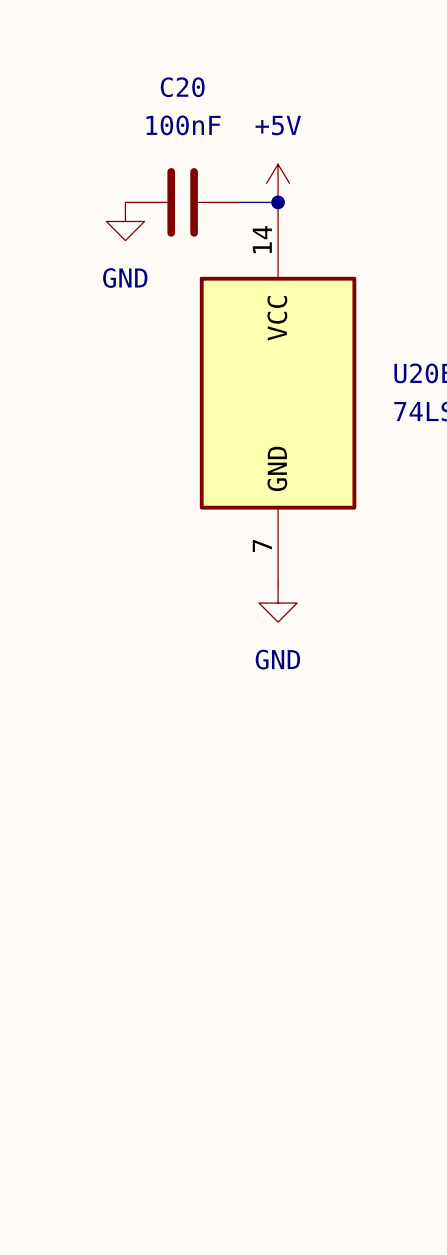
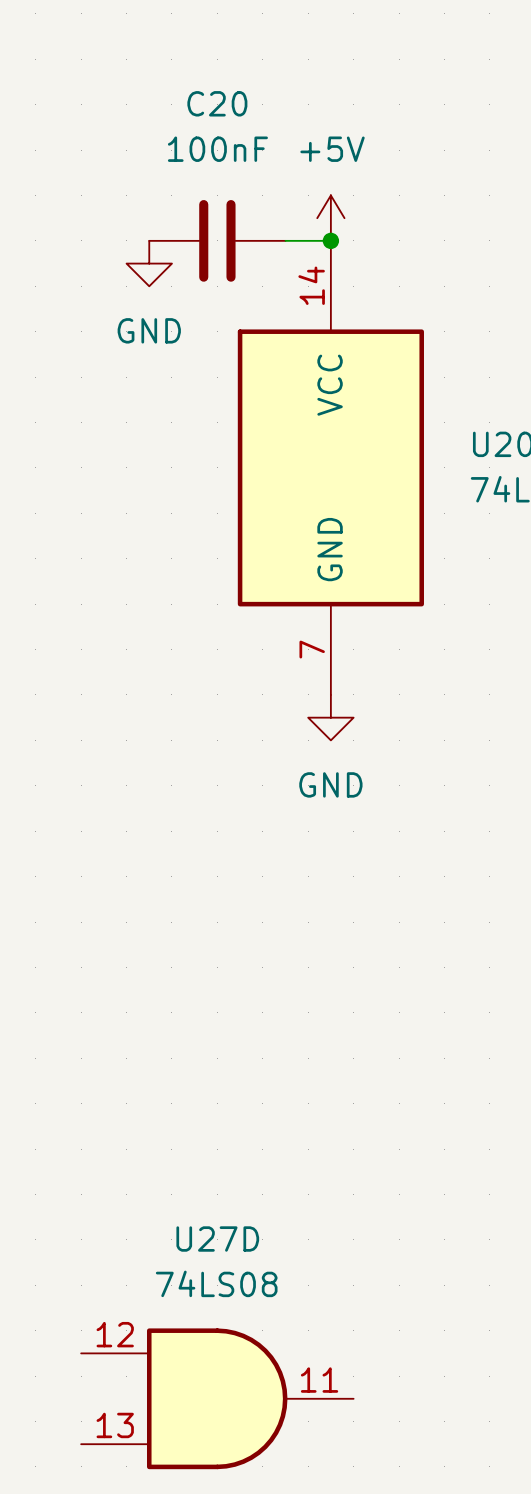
U27D: none -> 74LS08 (217, 1398)

